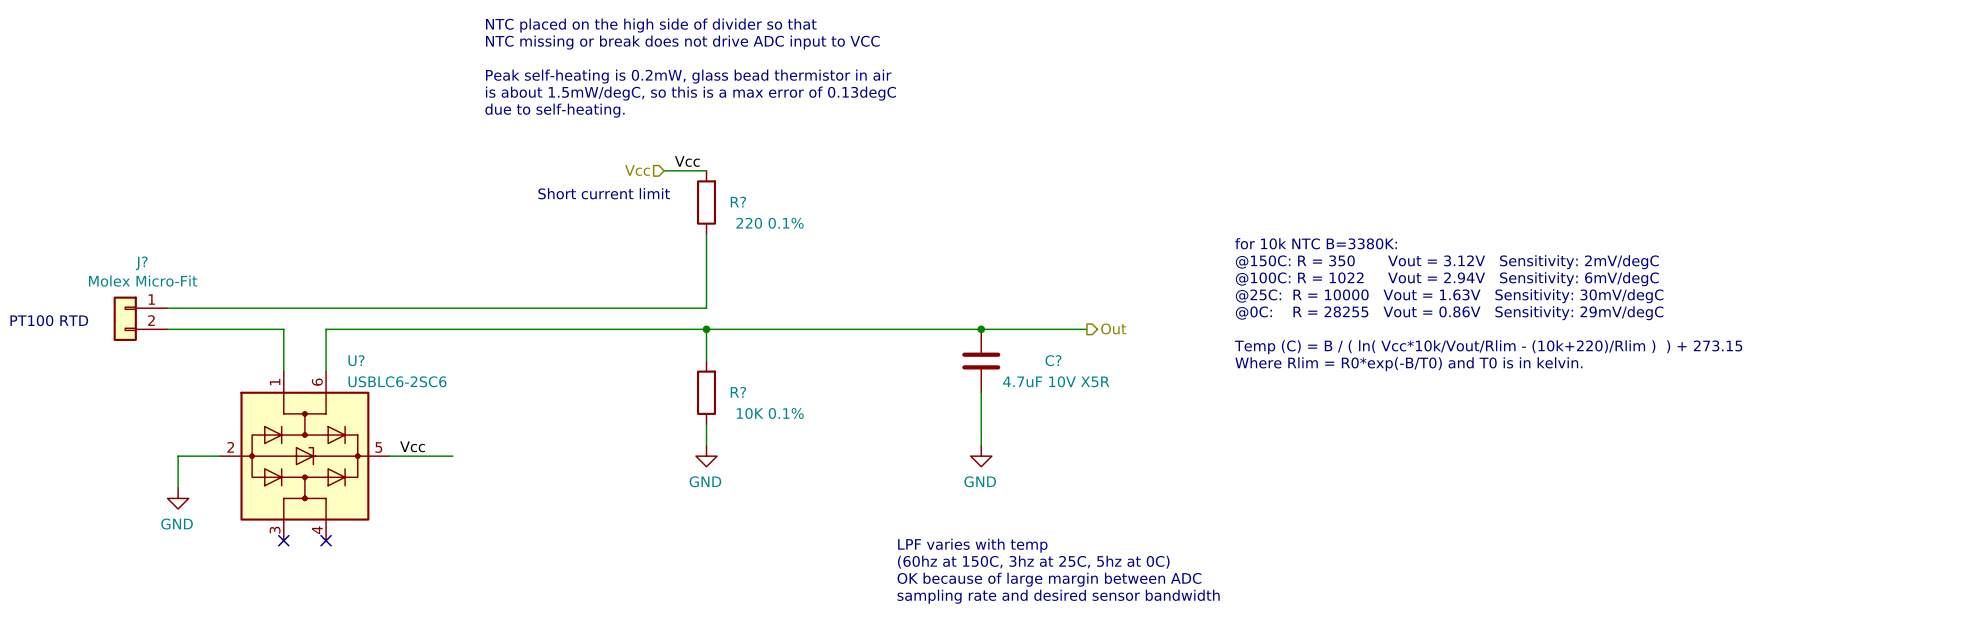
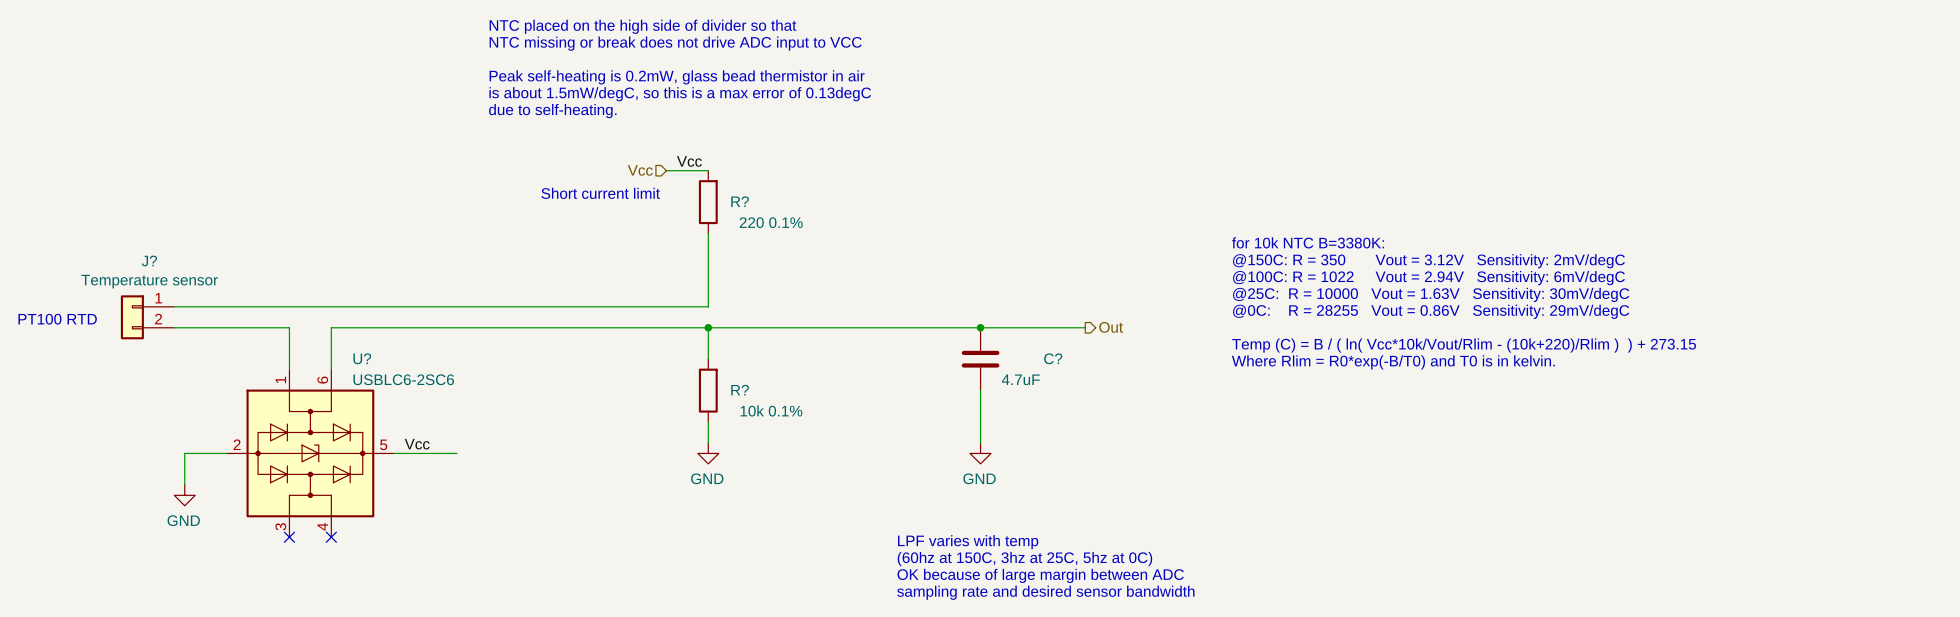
J? value: Molex Micro-Fit (143, 281) -> Temperature sensor (149, 281)
C? value: 4.7uF 10V X5R (1056, 381) -> 4.7uF (1020, 379)
R? value: 10K 0.1% (770, 413) -> 10k 0.1% (771, 410)

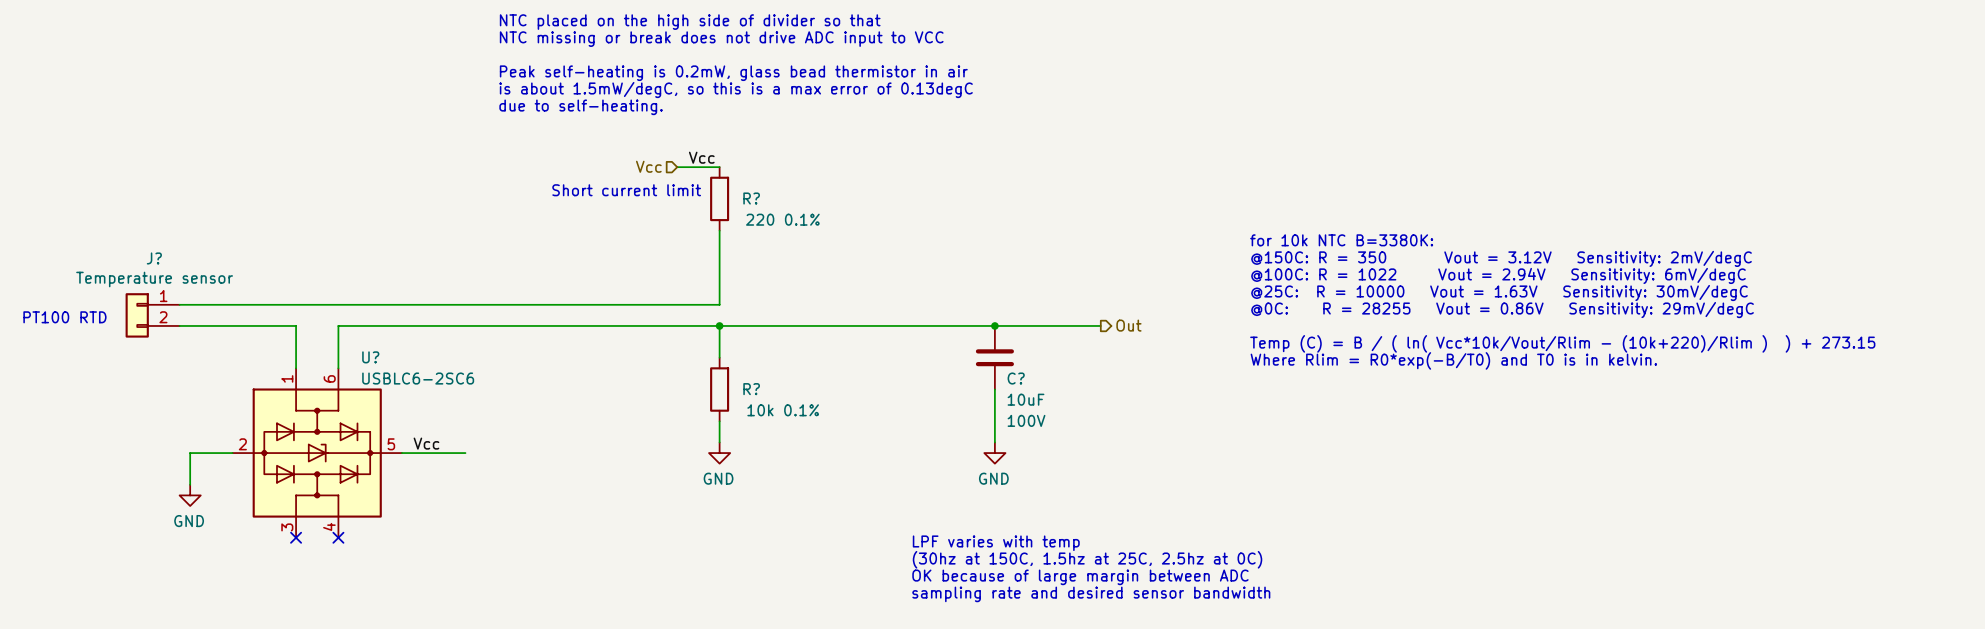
C? name position: C? (1053, 358) -> C? (1016, 378)
C? value: 4.7uF (1020, 379) -> 10uF (1026, 399)
C? text: none -> 100V (1026, 420)
text: (60hz at 150C, 3hz at 25C, 5hz at 0C) (1024, 559) -> (30hz at 150C, 1.5hz at 25C, 2.5hz at 0C) (1087, 559)

